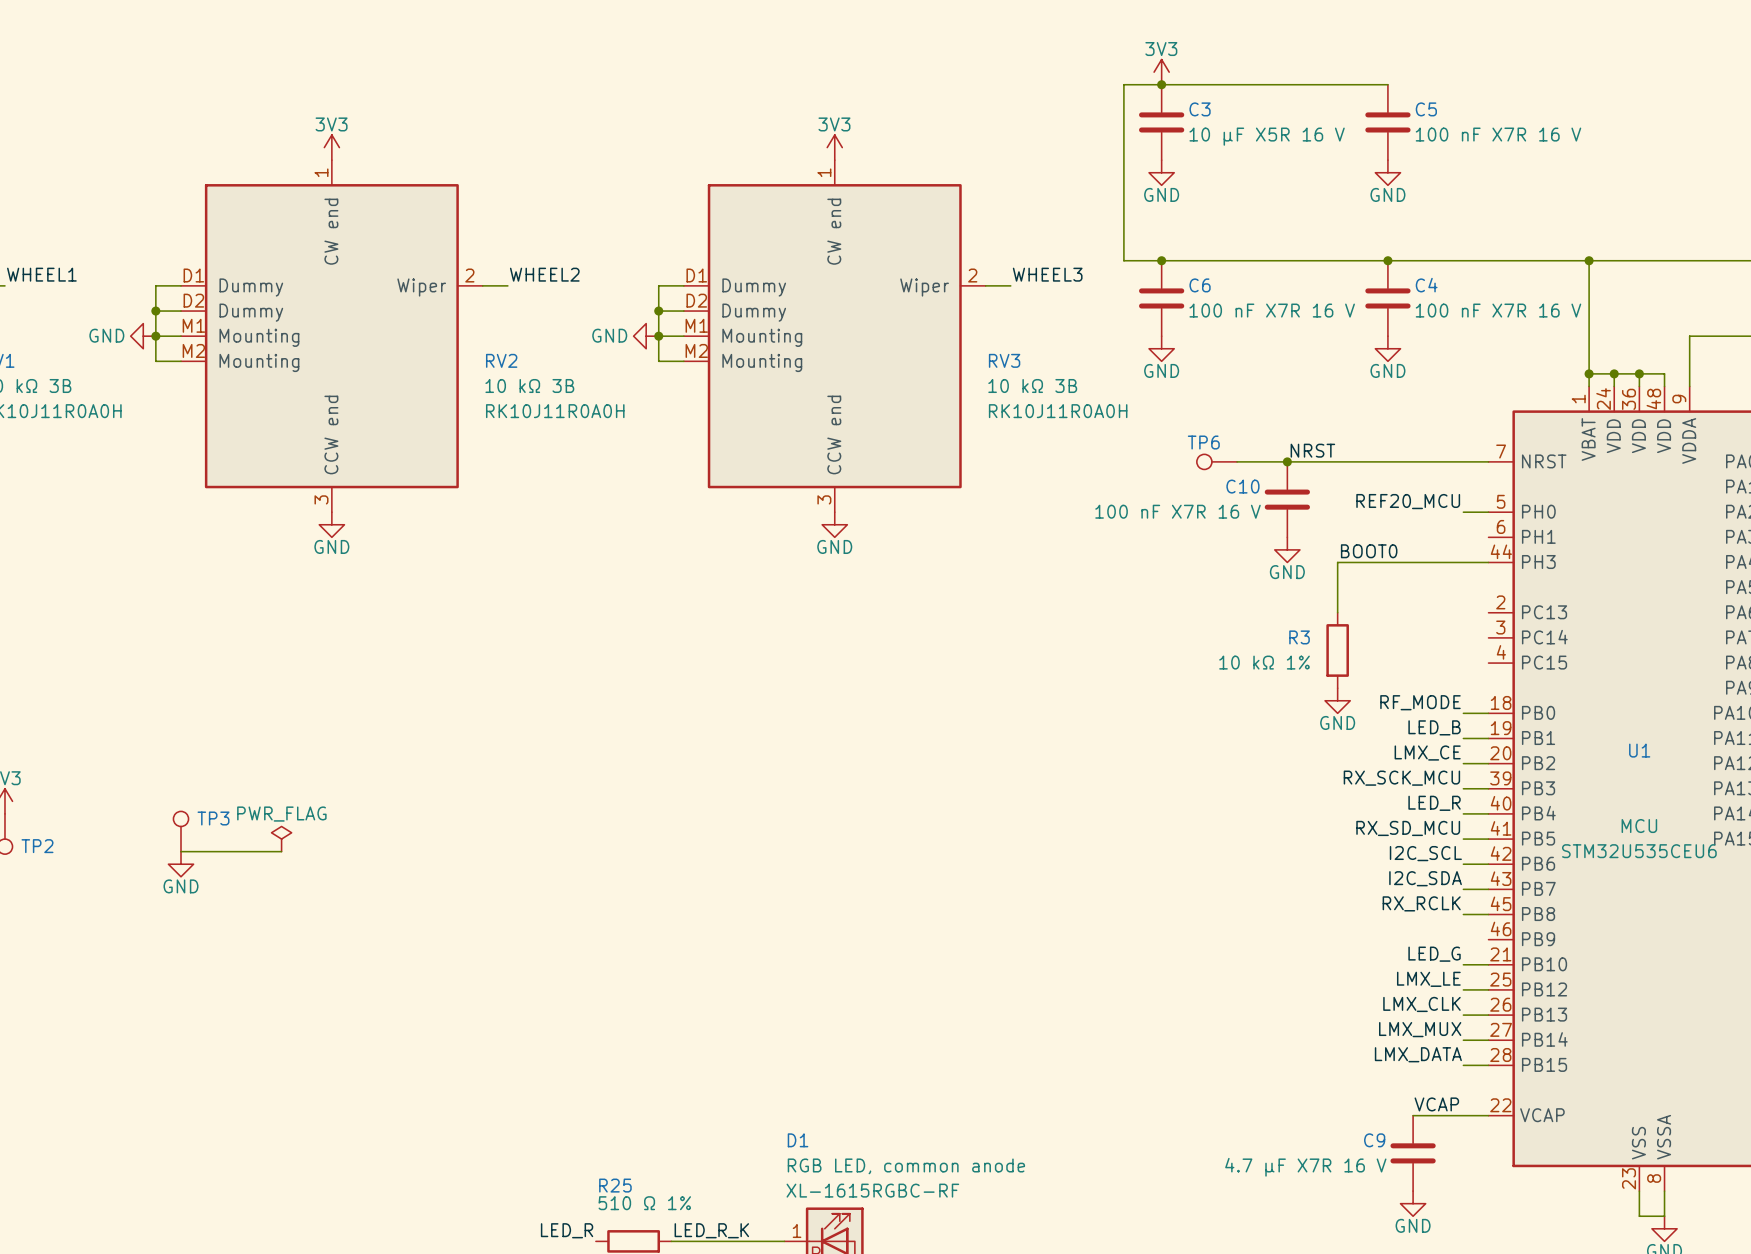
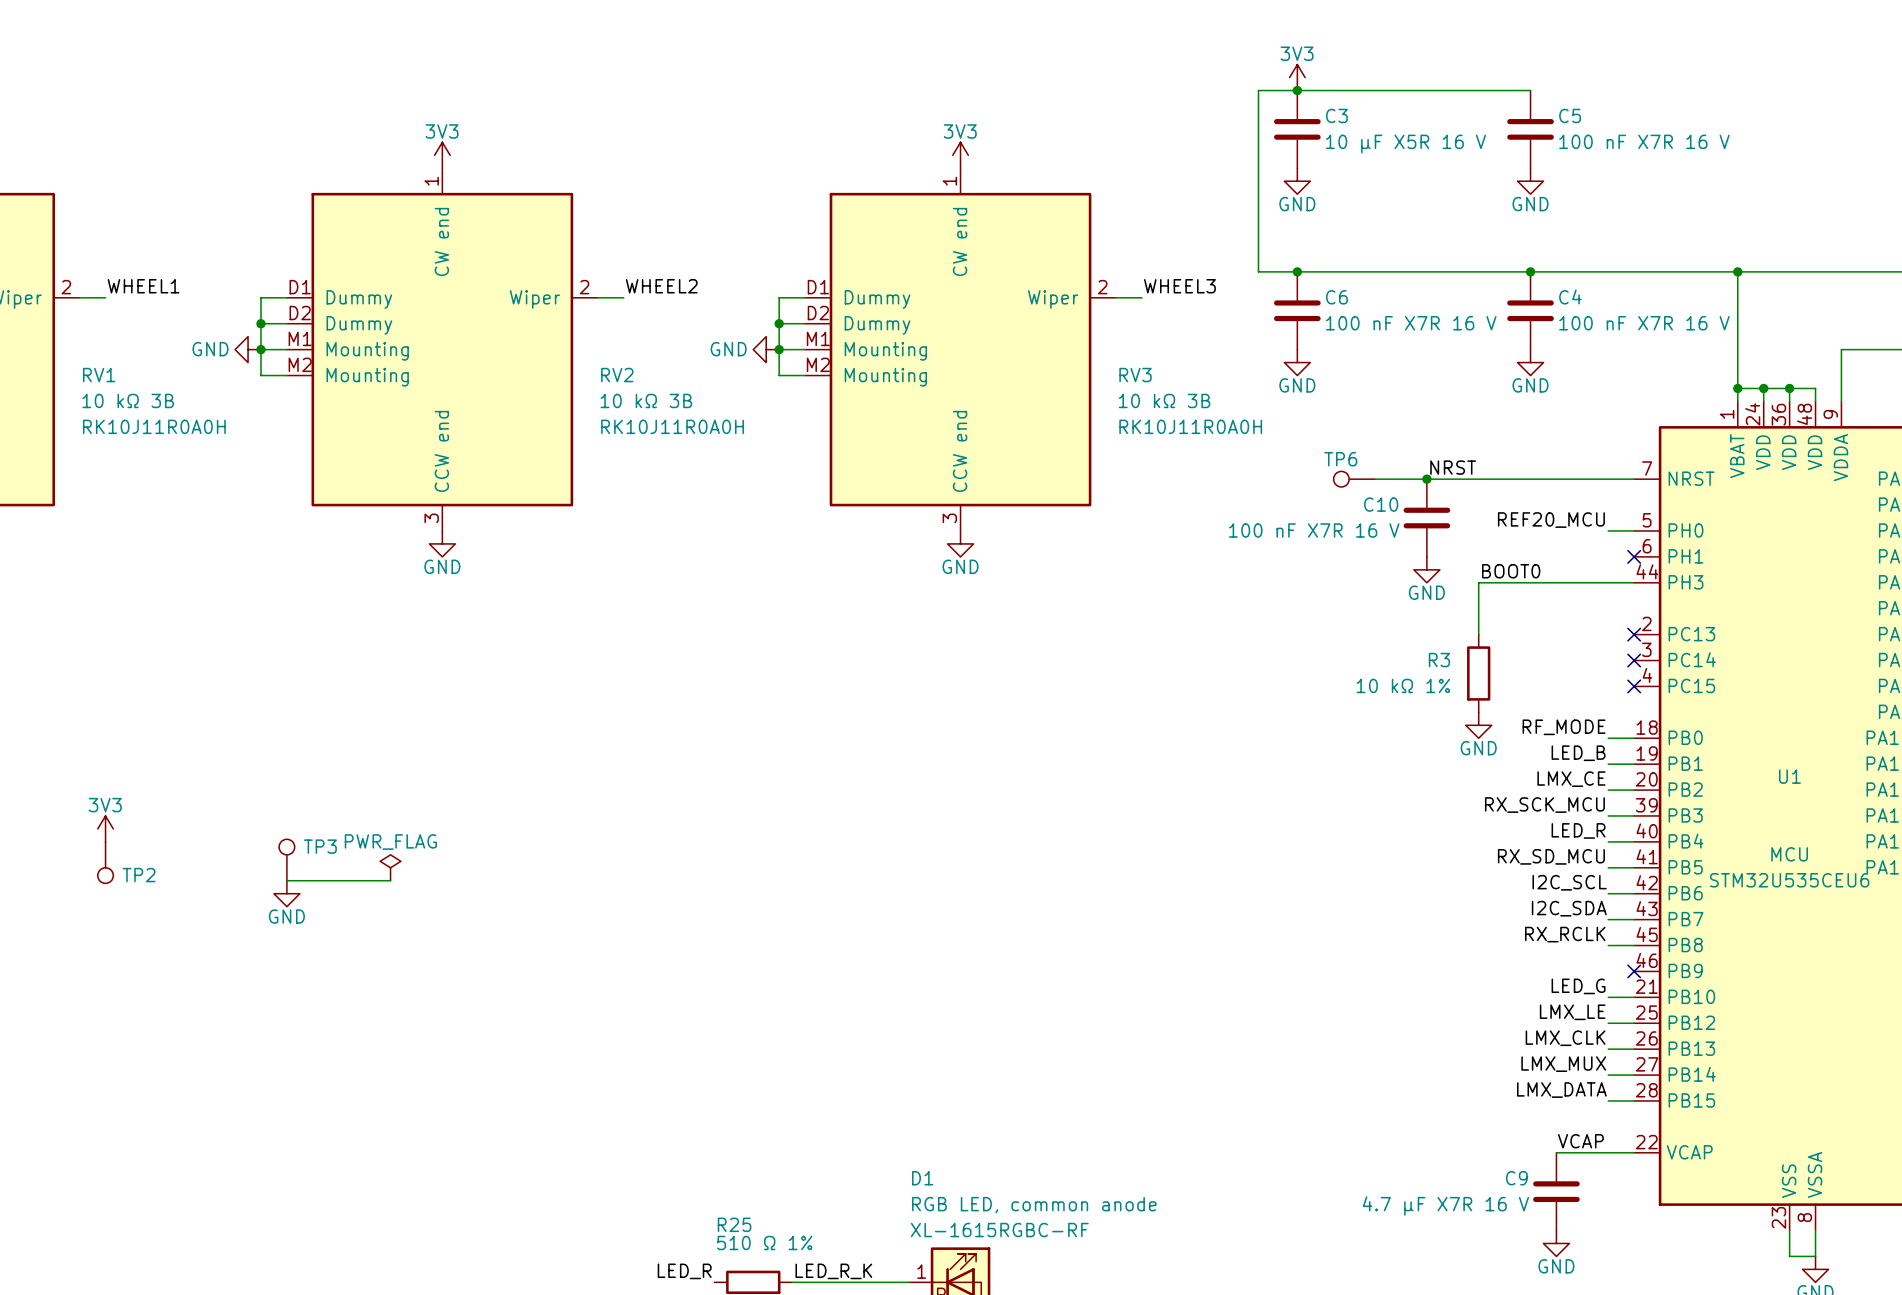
no-connect mark: none -> (1634, 556)
no-connect mark: none -> (1634, 634)
no-connect mark: none -> (1634, 660)
no-connect mark: none -> (1634, 686)
no-connect mark: none -> (1634, 971)

